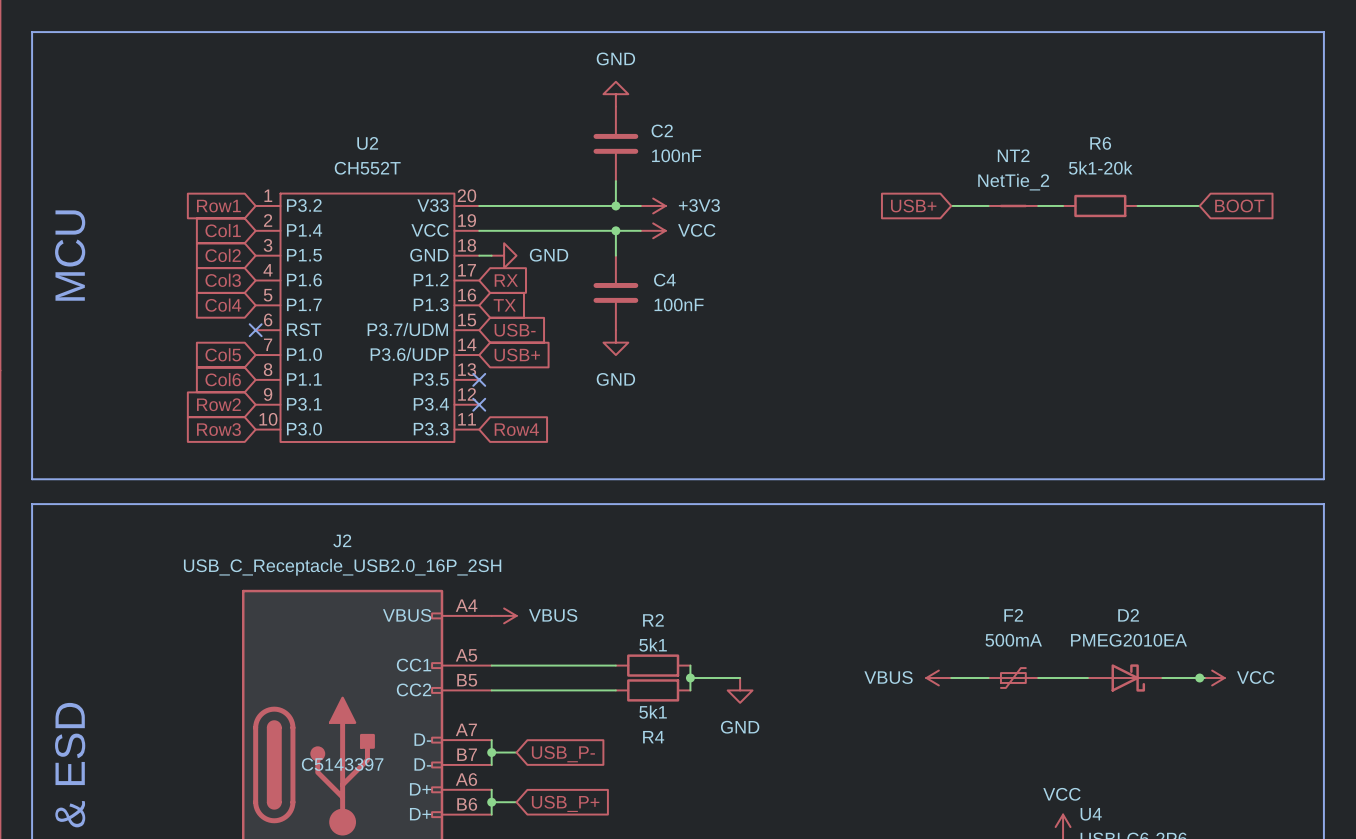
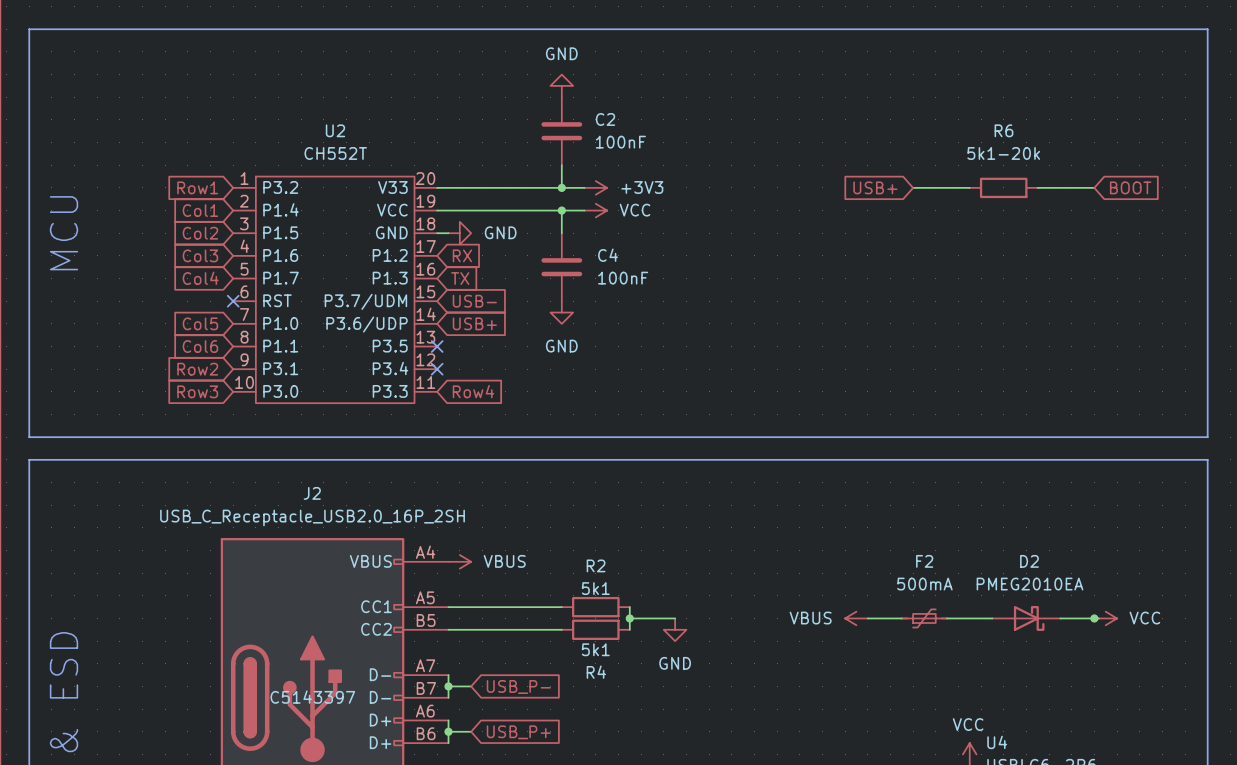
global label position: USB+ (913, 205) -> USB+ (875, 187)
NT2: NetTie_2 (1013, 205) -> none

